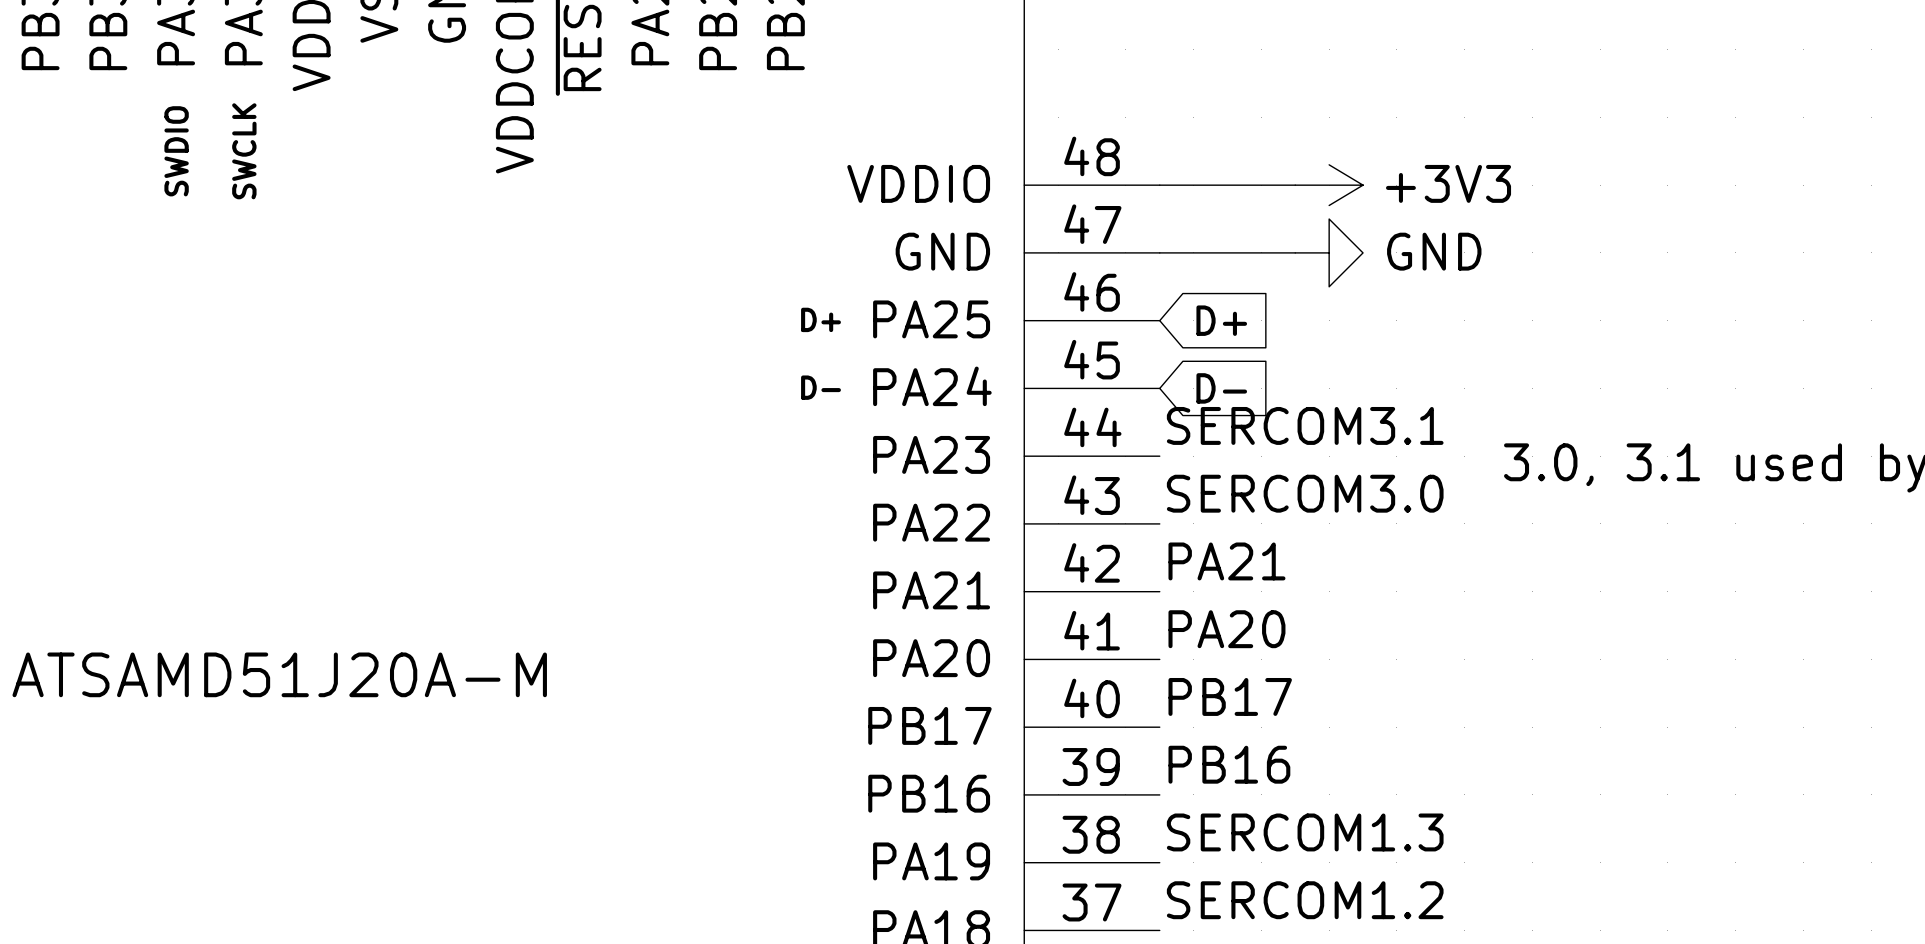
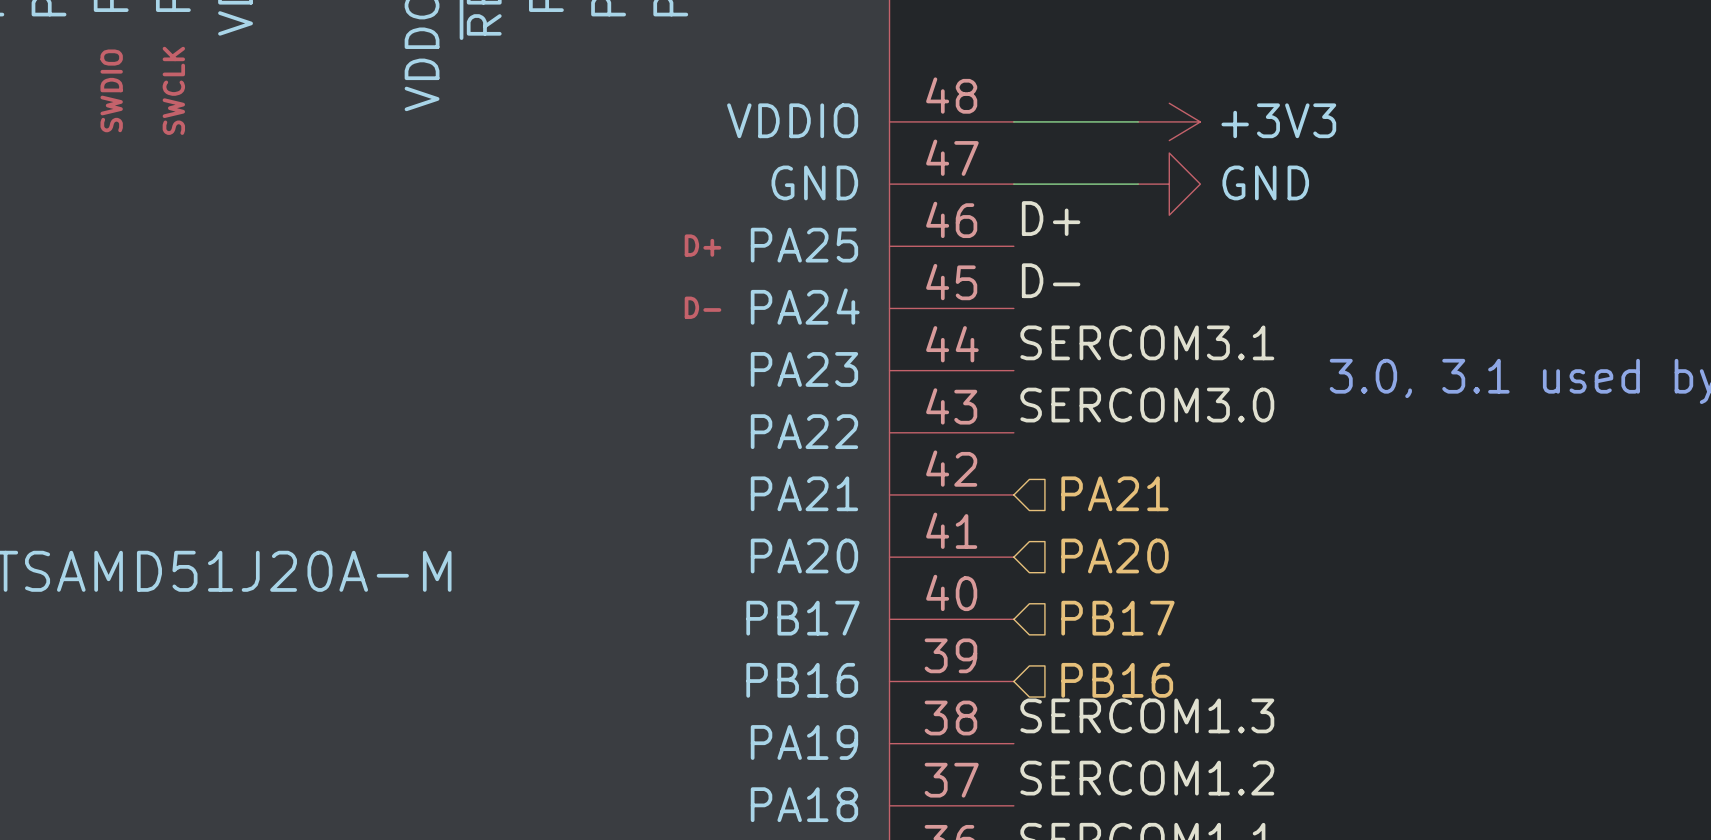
label: none -> D+ (1051, 218)
global label: D+ (1221, 320) -> none
label: none -> D- (1051, 280)
global label: D- (1221, 388) -> none
label: PA21 (1226, 561) -> none
hierarchical label: none -> PA21 (1115, 493)
label: PA20 (1226, 629) -> none
hierarchical label: none -> PA20 (1115, 555)
label: PB17 (1230, 696) -> none
hierarchical label: none -> PB17 (1117, 618)
label: PB16 (1229, 764) -> none
hierarchical label: none -> PB16 (1117, 680)

